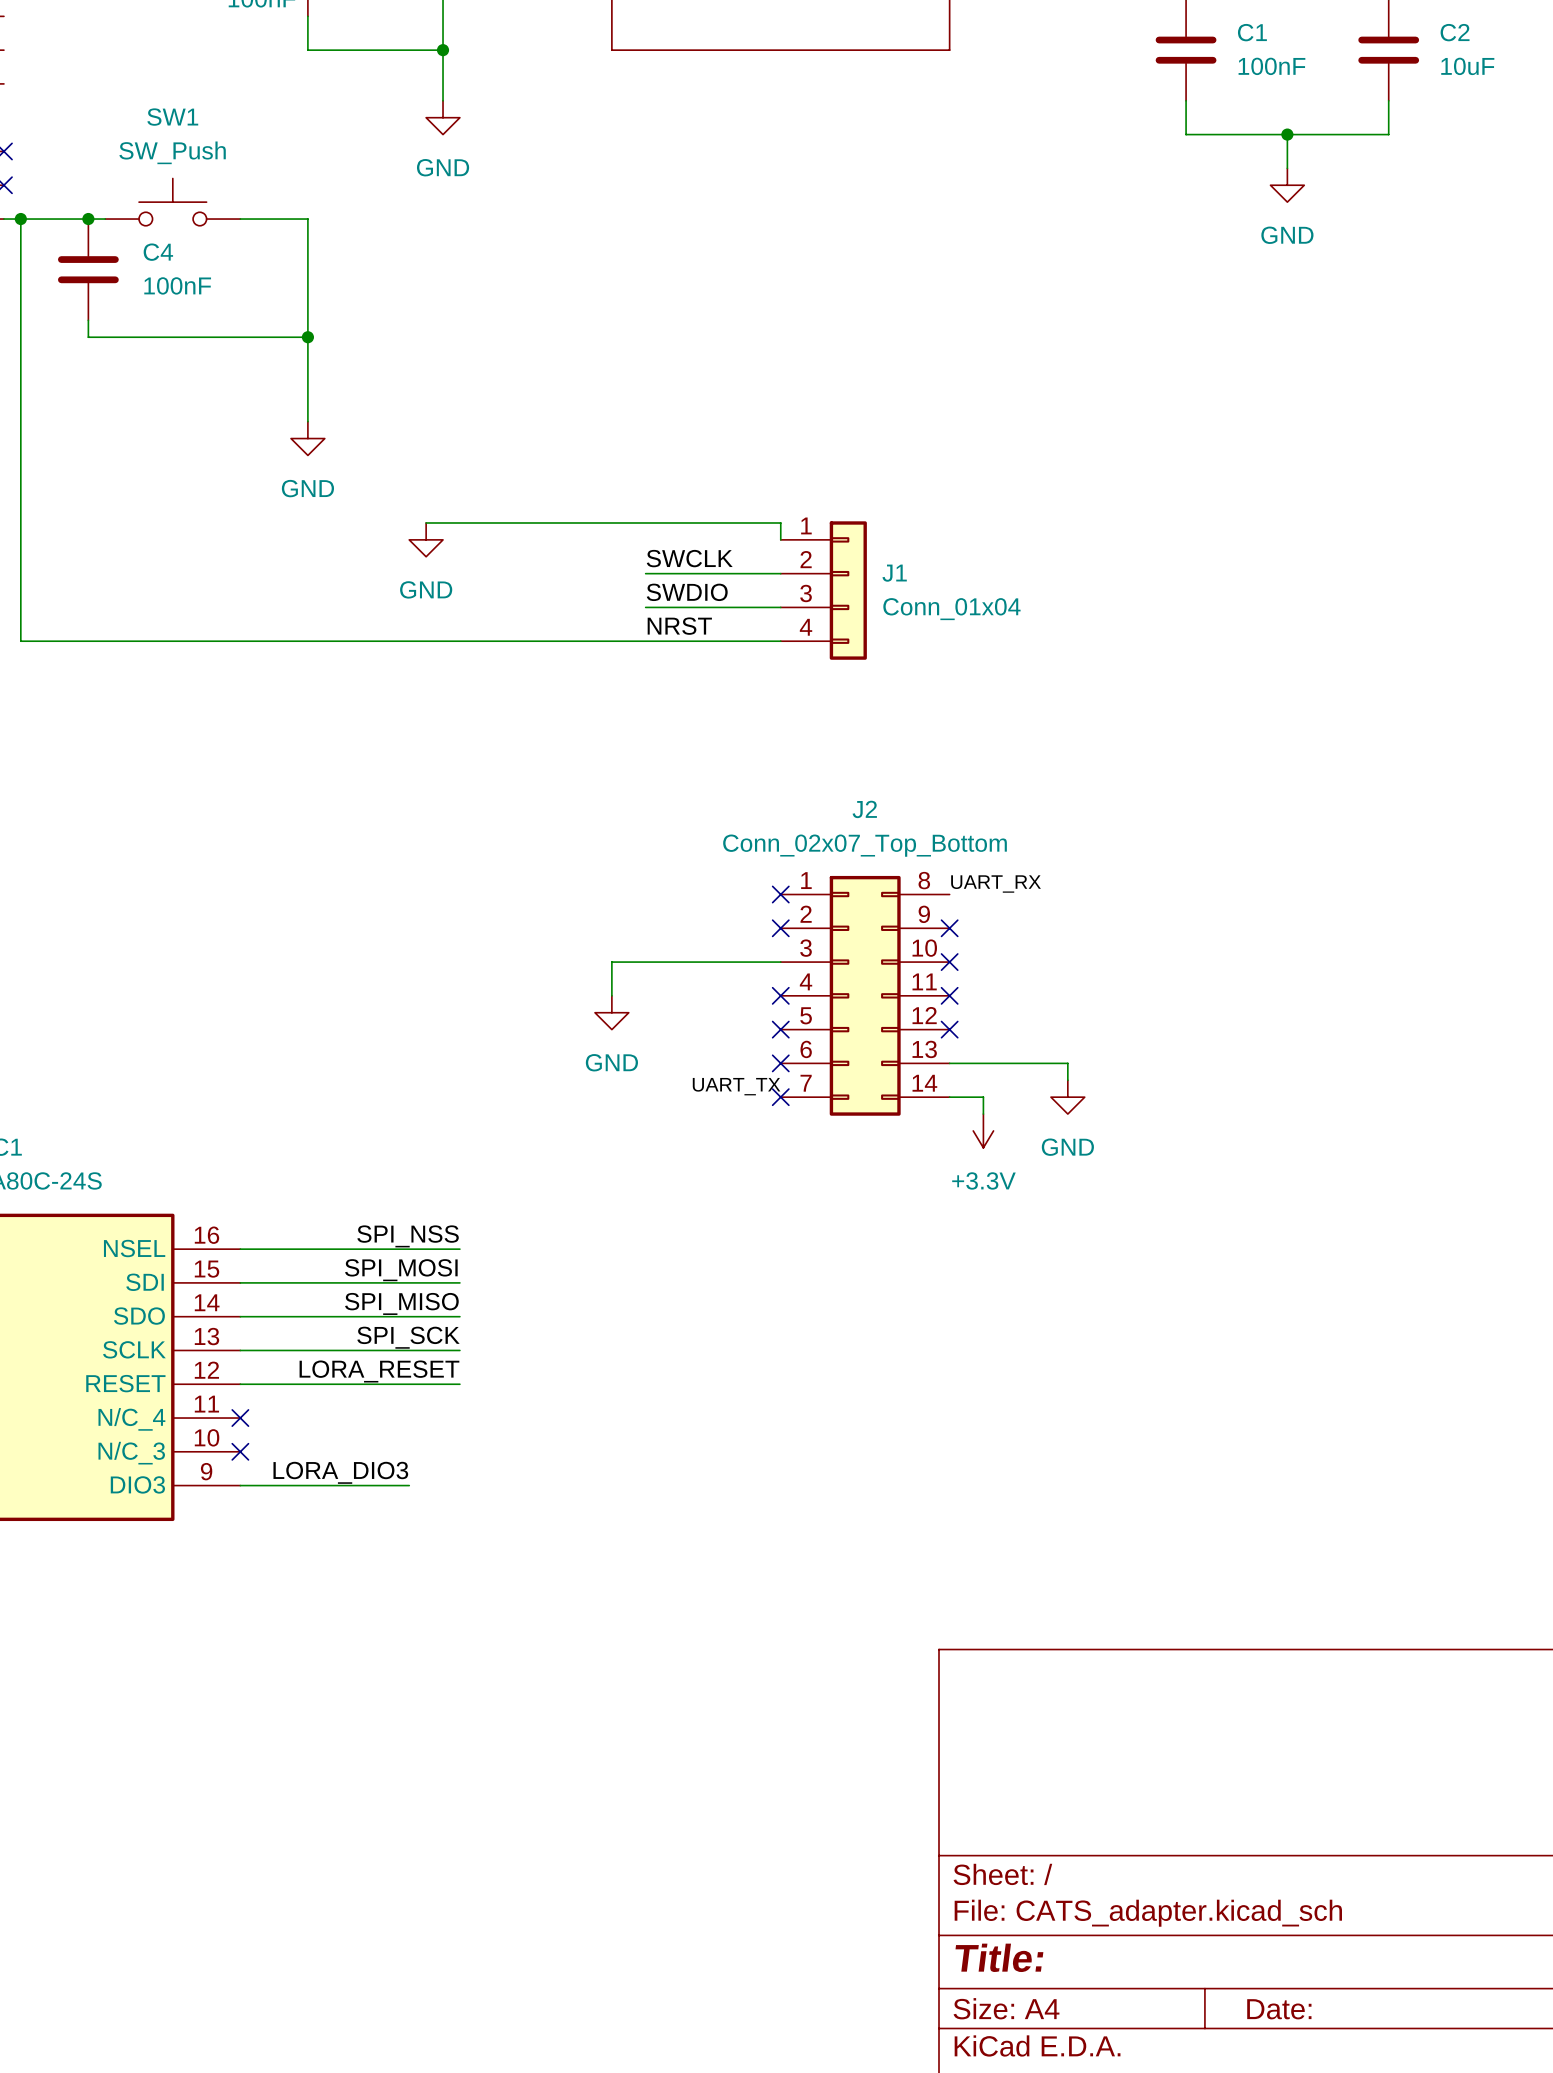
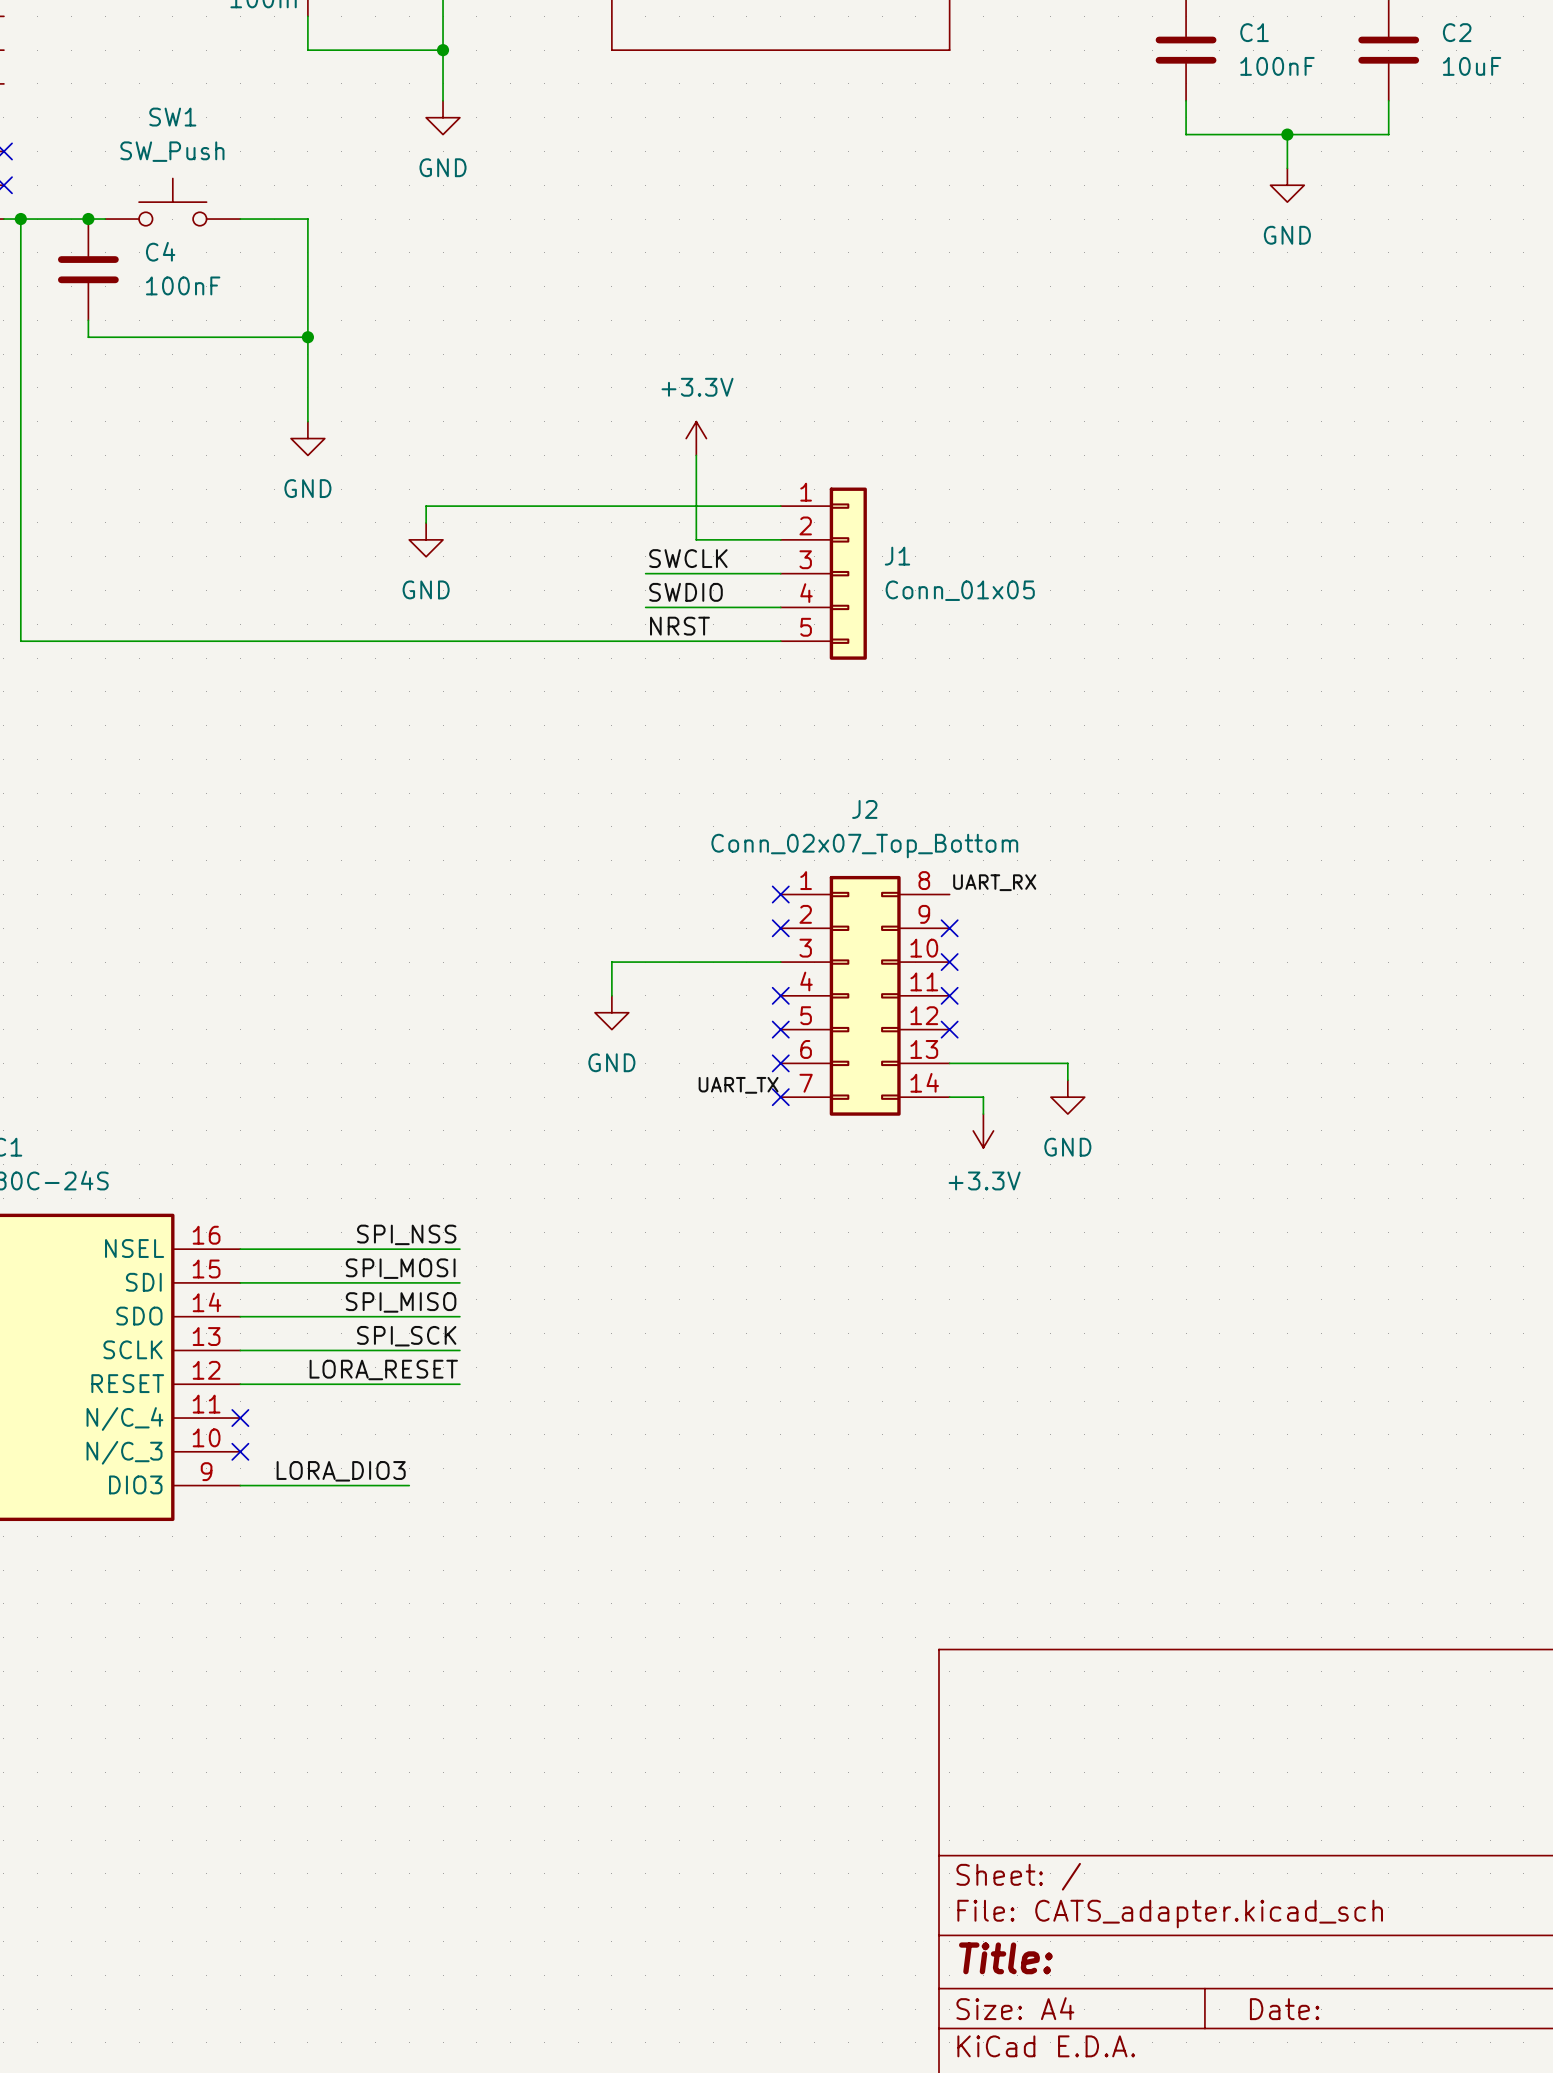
power symbol: none -> +3.3V (696, 438)
wire: none -> (696, 455) (696, 539) (780, 539)
J1 symbol: [780, 521, 867, 660] -> [780, 487, 867, 660]
wire: (426, 522) (780, 522) (780, 539) -> (426, 522) (426, 506) (780, 506)
J1 value: Conn_01x04 (951, 609) -> Conn_01x05 (960, 590)

